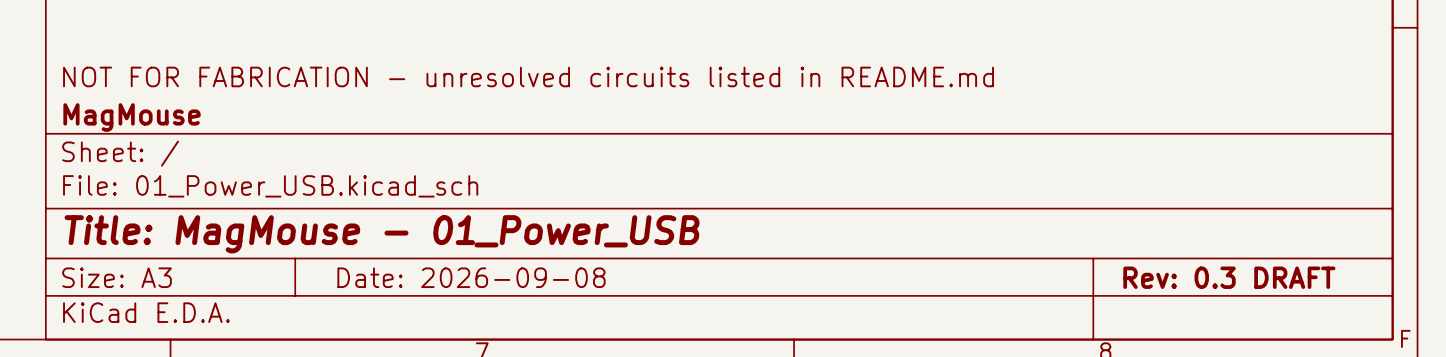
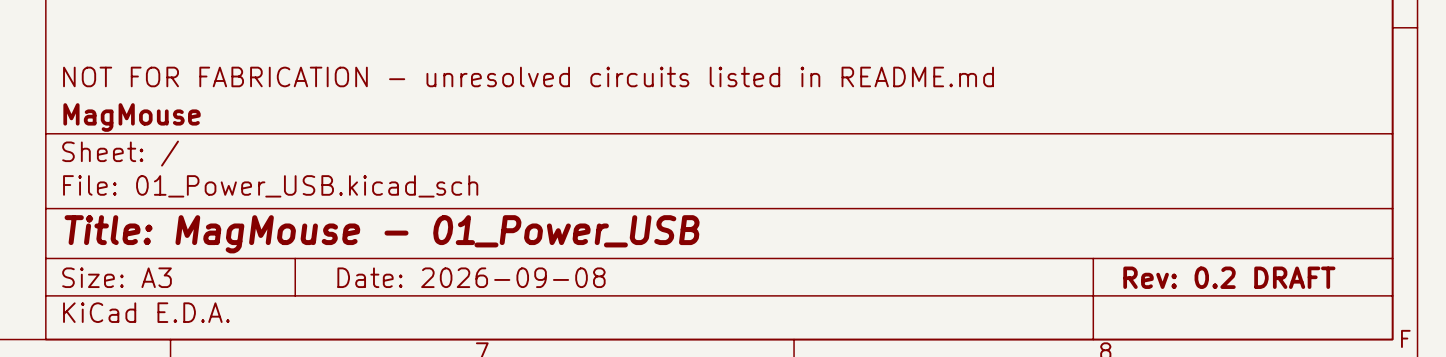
title block: Rev: 0.3 DRAFT (1229, 277) -> Rev: 0.2 DRAFT (1229, 277)

